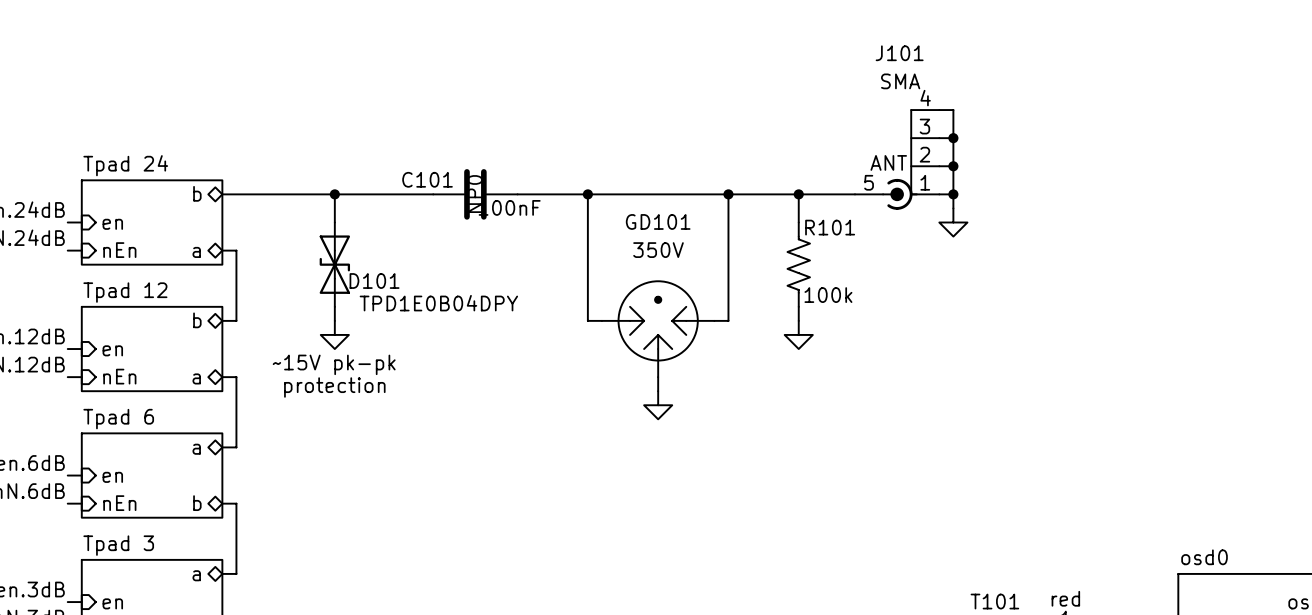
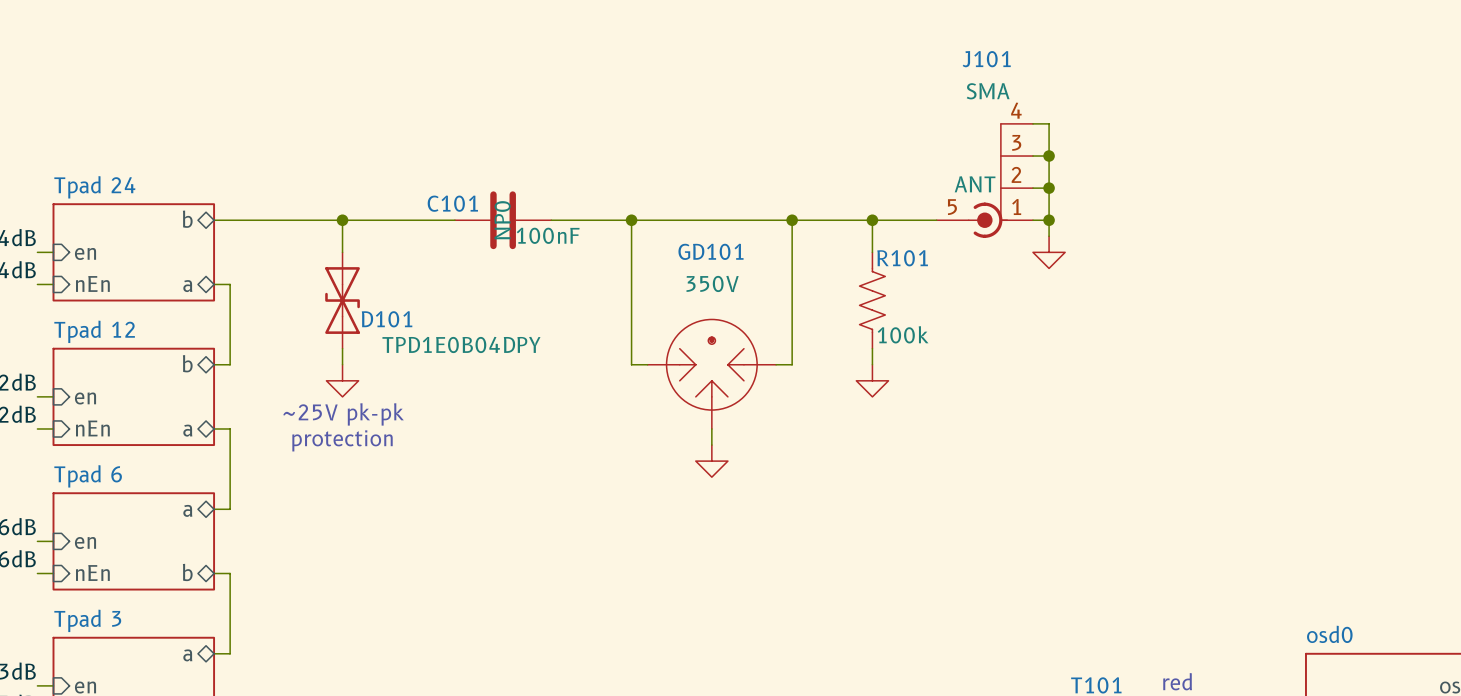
text: ~15V pk-pk (334, 364) -> ~25V pk-pk (343, 414)

